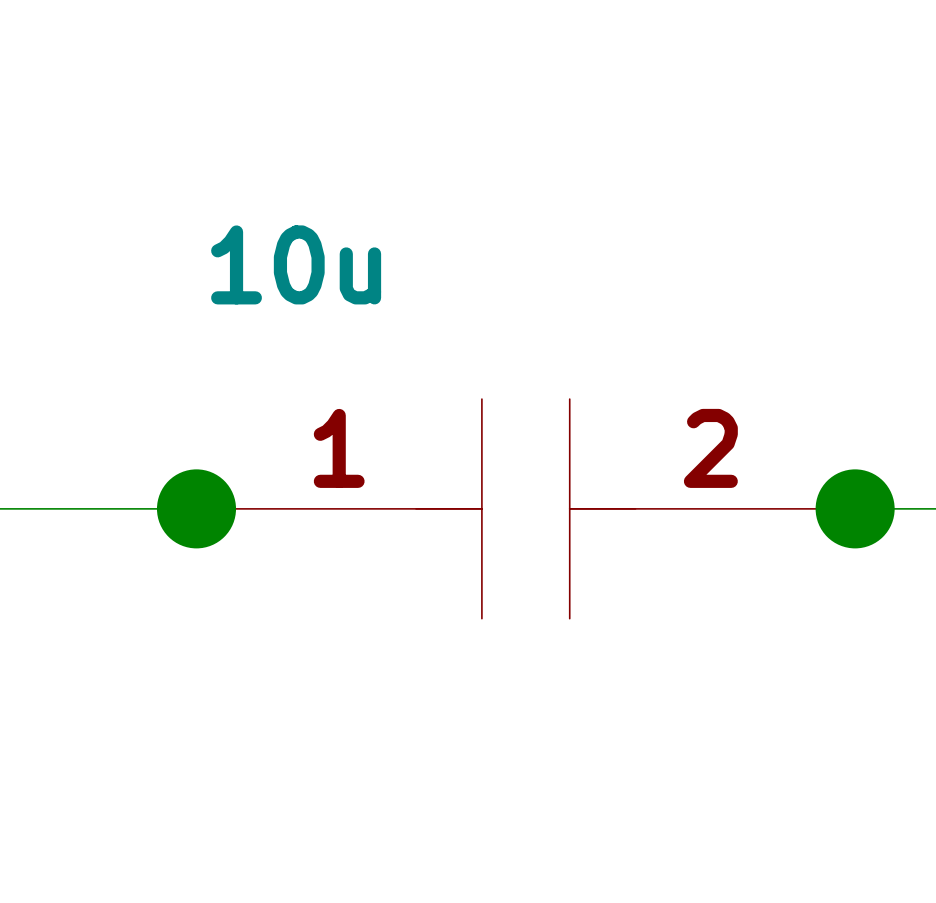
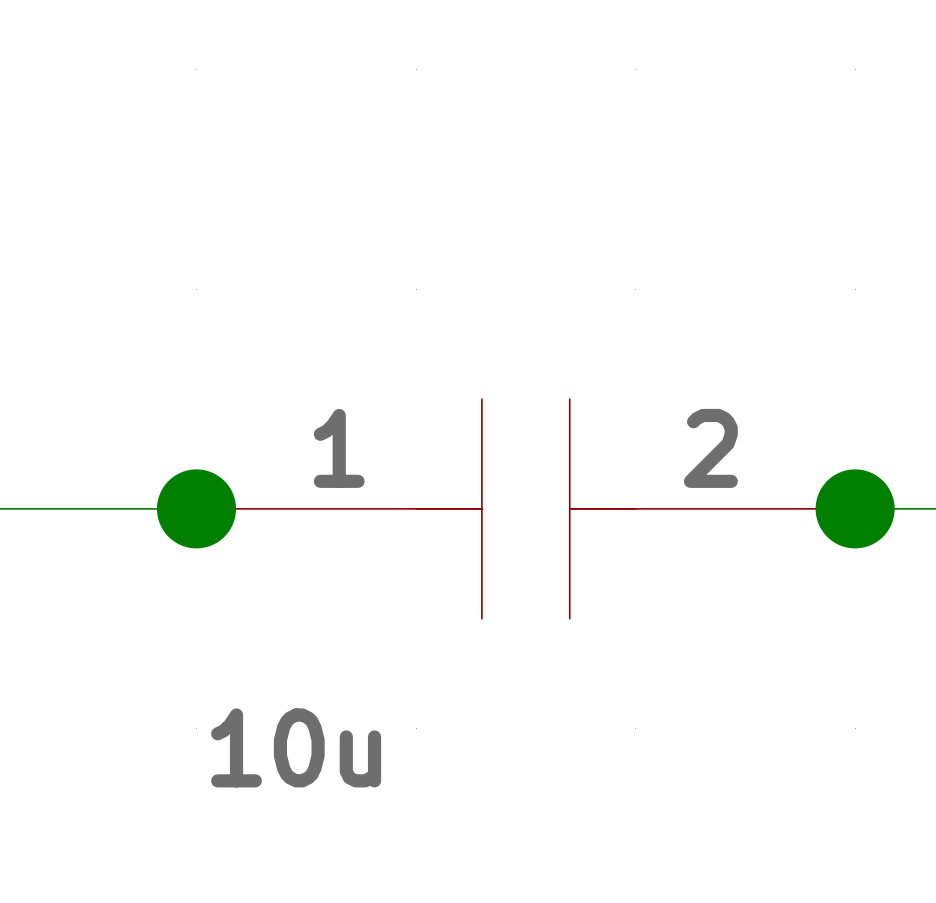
part value position: 10u (296, 264) -> 10u (296, 747)

